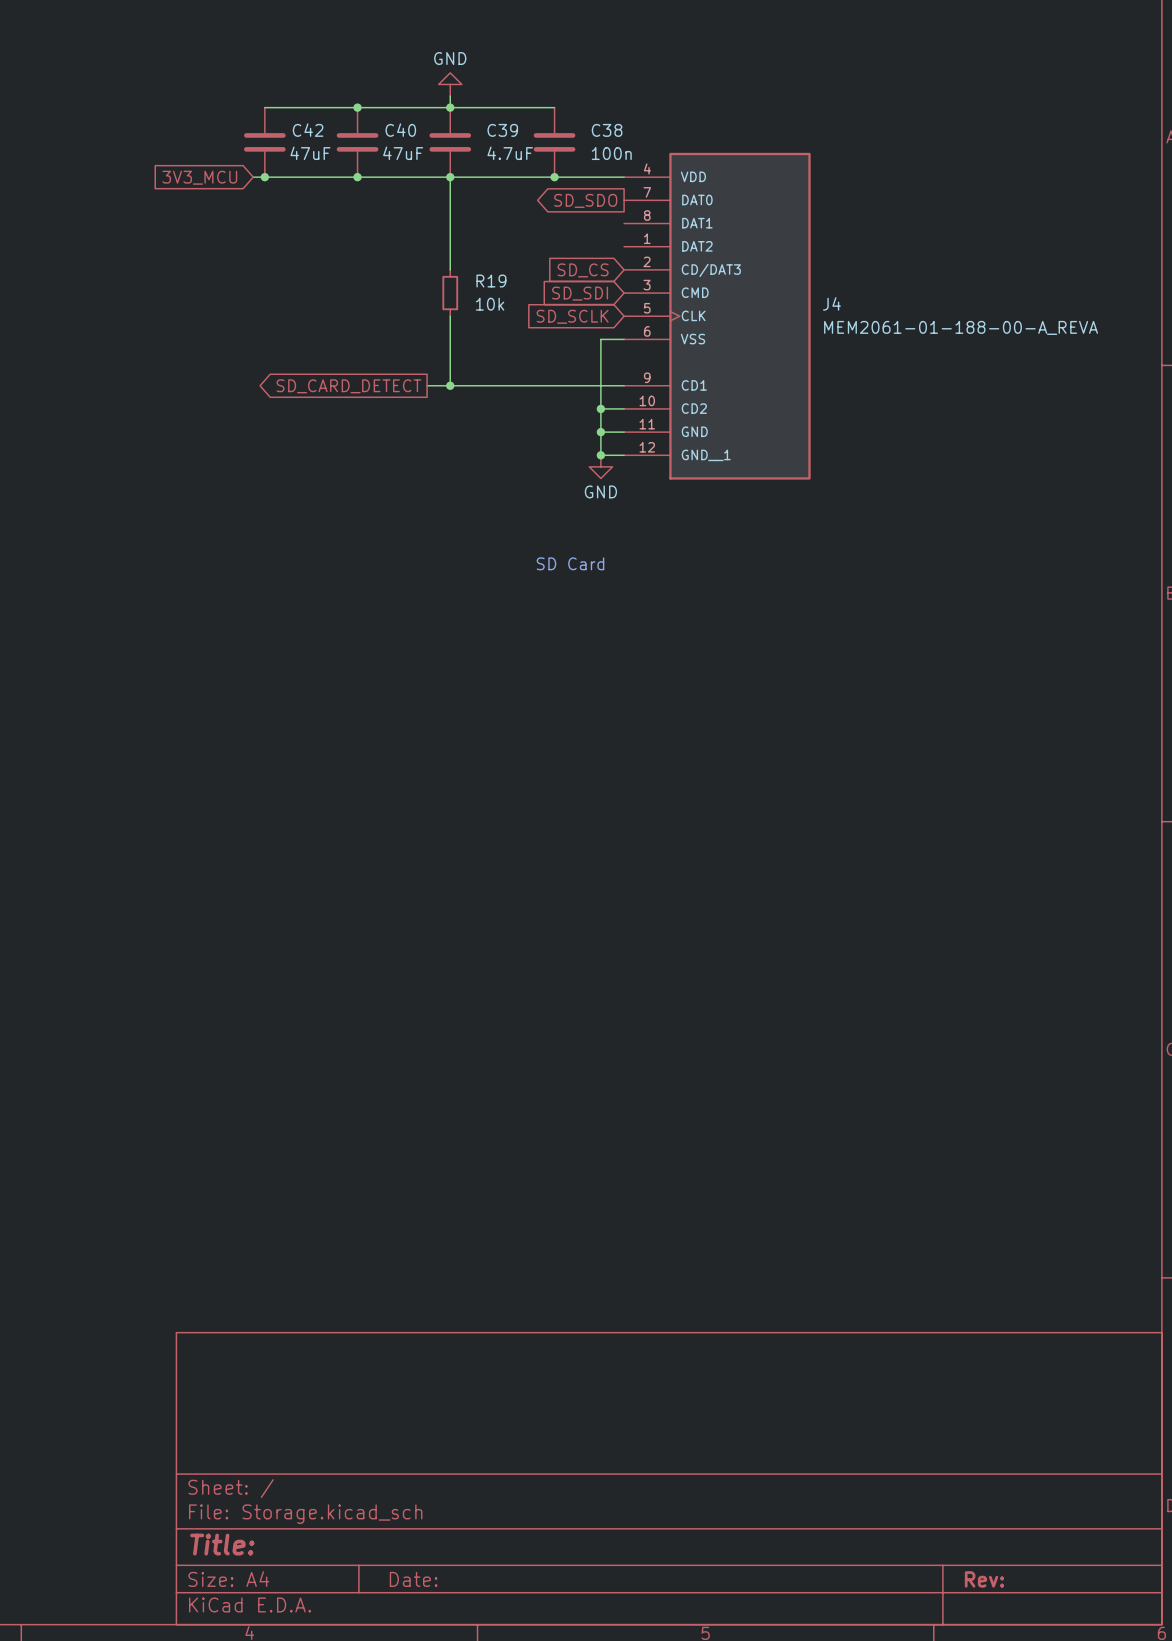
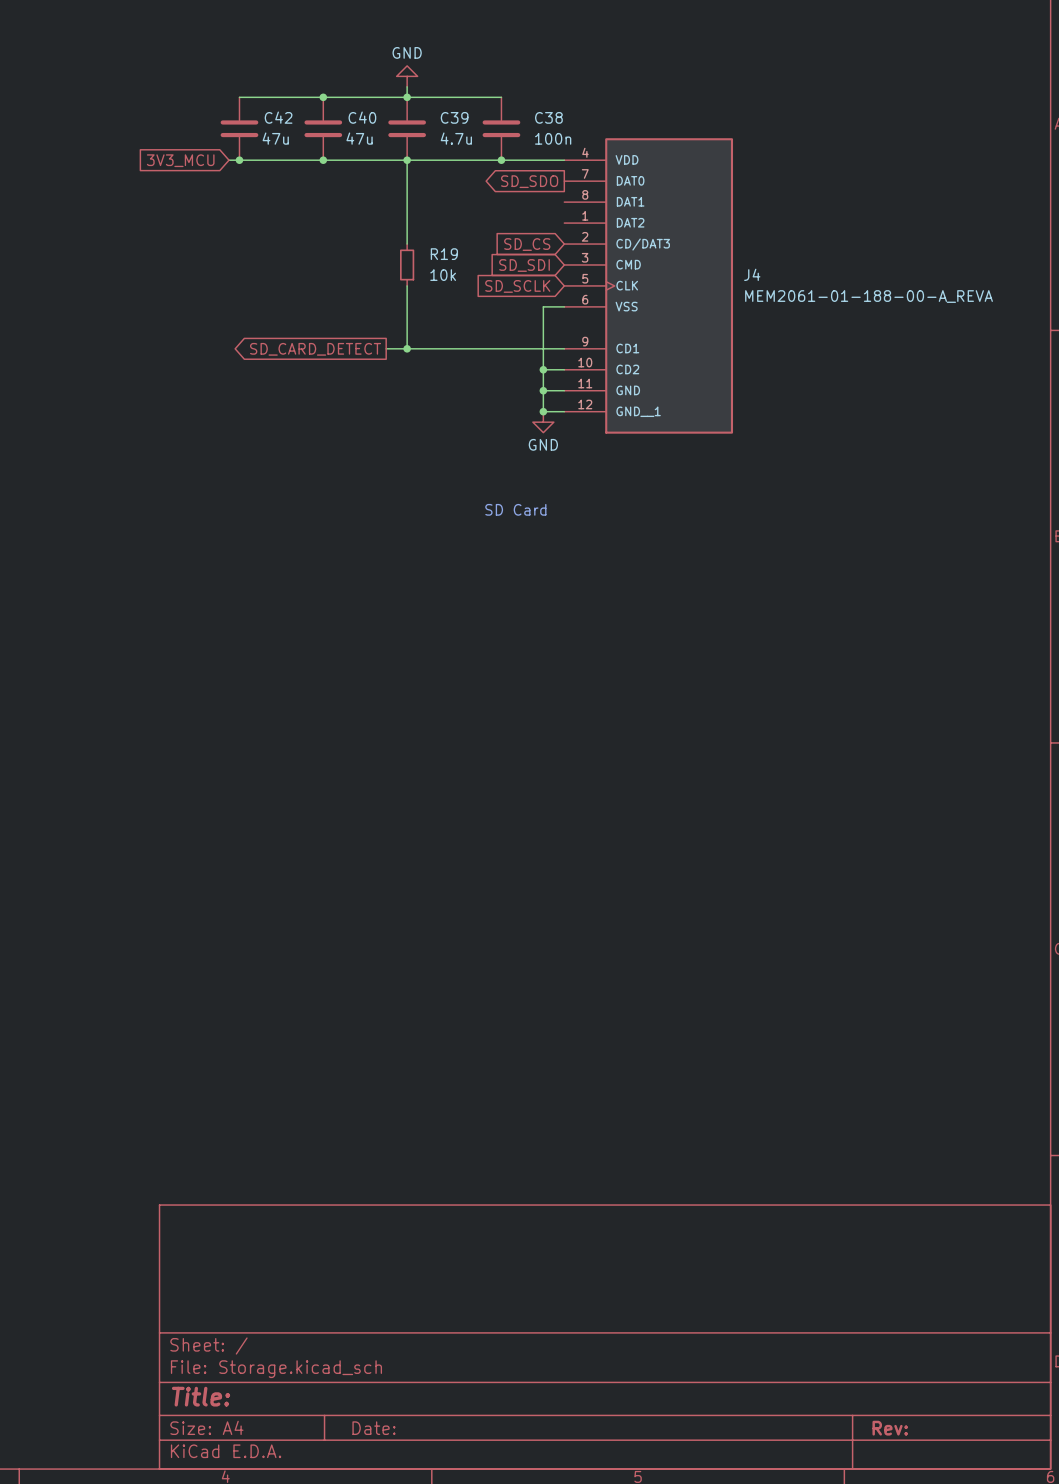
C42 value: 47uF (310, 153) -> 47u (275, 138)
C40 value: 47uF (403, 153) -> 47u (359, 138)
C39 value: 4.7uF (510, 153) -> 4.7u (456, 138)

